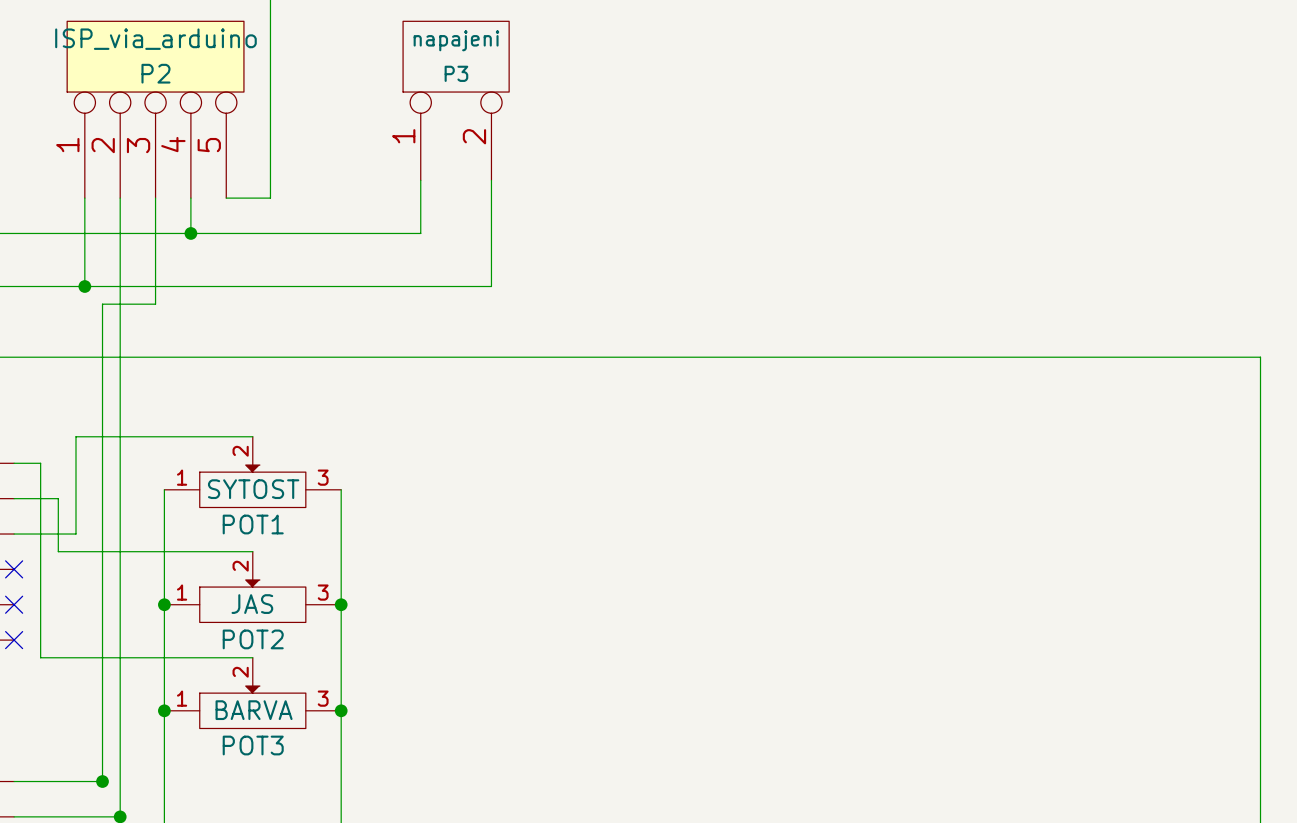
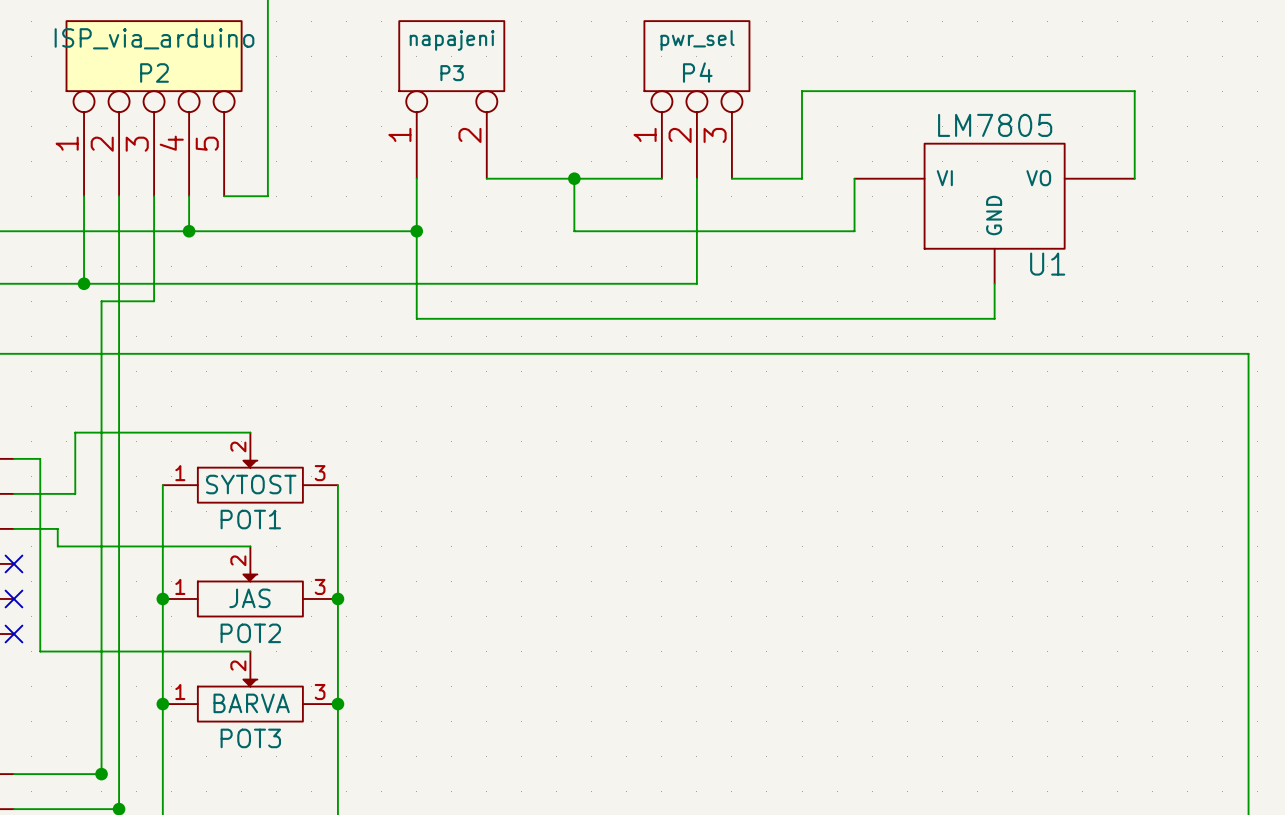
P4: none -> pwr_sel (696, 99)
wire: (491, 180) (491, 286) -> (486, 178) (661, 178)
wire: none -> (574, 178) (574, 231) (854, 231) (854, 178)
junction: none -> (574, 178)
wire: none -> (696, 178) (696, 283) (486, 283)
wire: none -> (731, 178) (802, 178) (802, 91) (1134, 91) (1134, 178)
U1: none -> LM7805 (994, 213)
wire: none -> (416, 231) (416, 318) (994, 318) (994, 283)
junction: none -> (416, 231)
wire: (58, 498) (58, 534) (75, 534) (75, 498) -> (57, 493) (75, 493)

